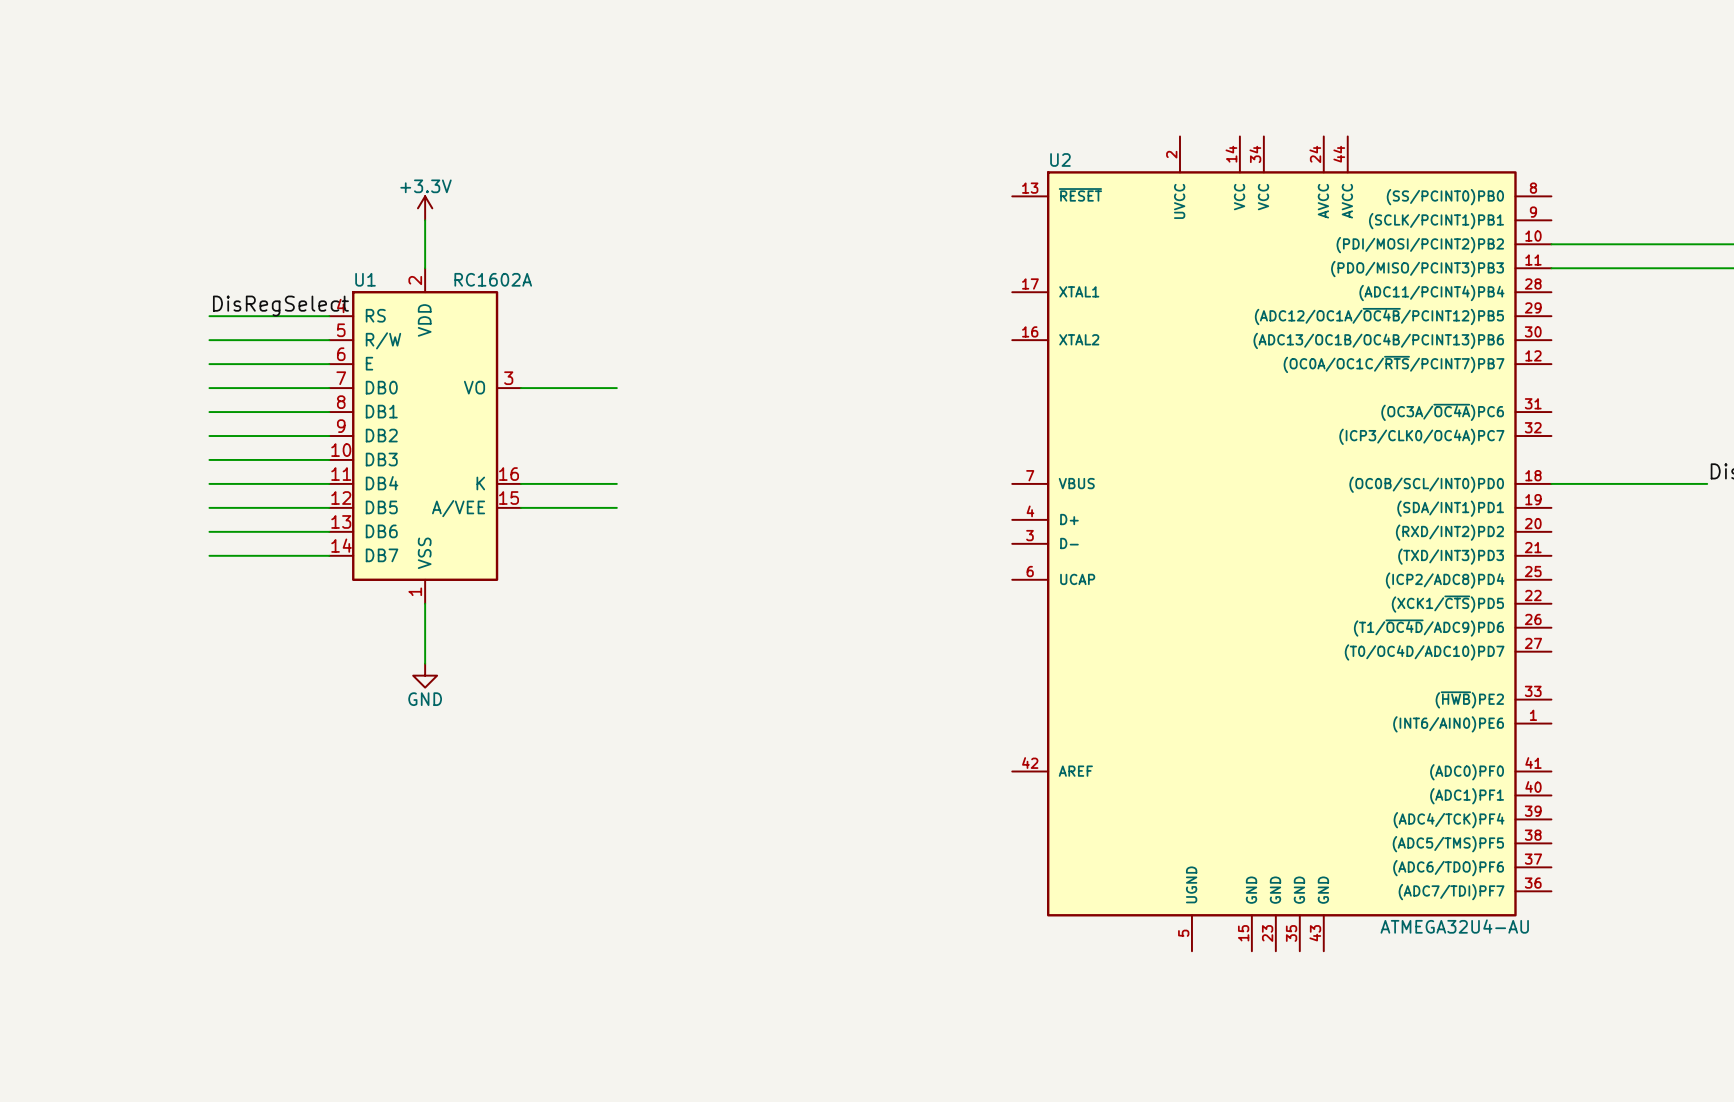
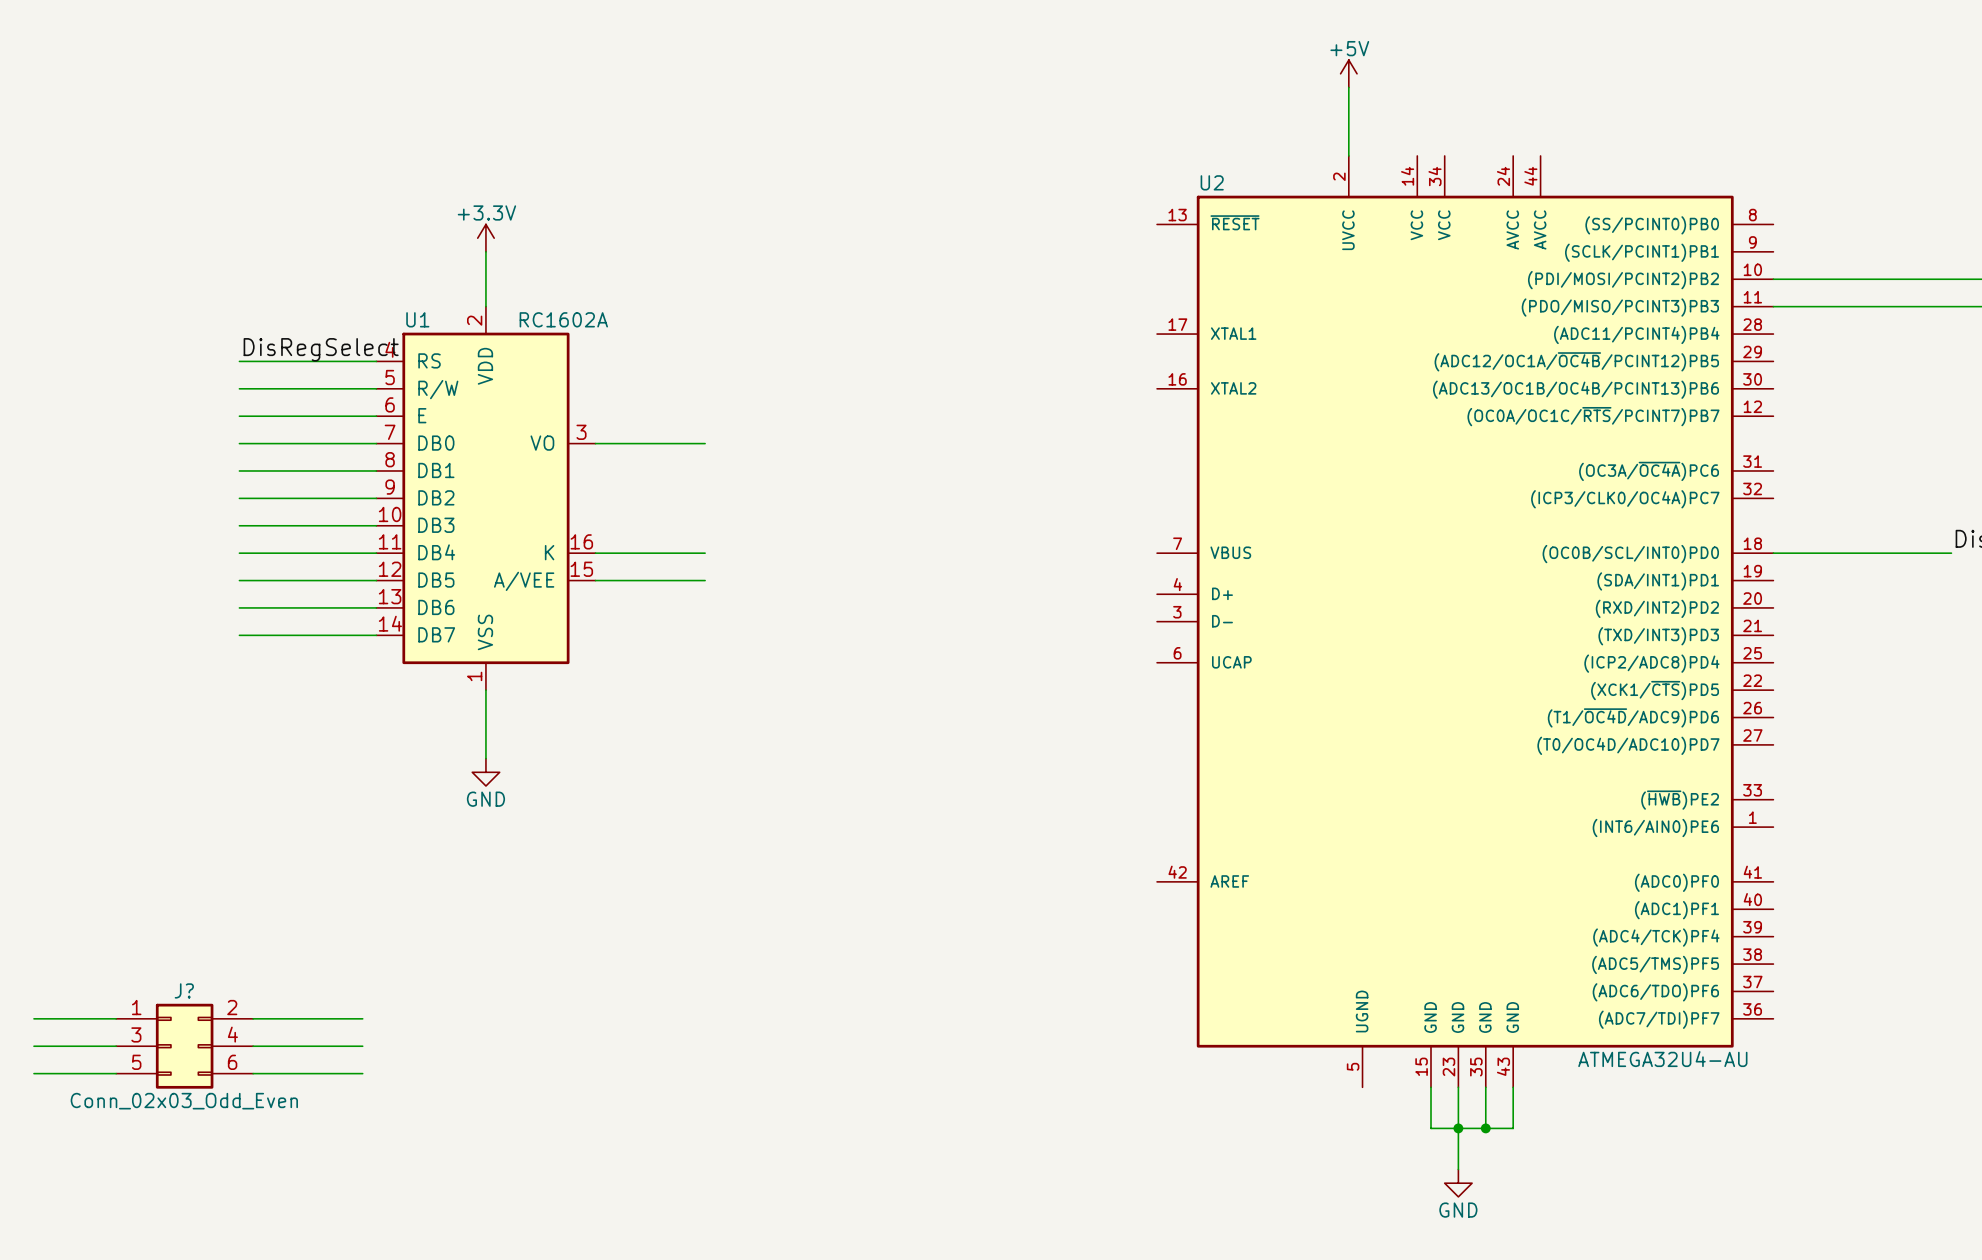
power symbol: none -> +5V (1348, 73)
wire: none -> (1348, 87) (1348, 155)
wire: none -> (33, 1018) (116, 1018)
wire: none -> (253, 1018) (362, 1018)
wire: none -> (33, 1046) (116, 1046)
J?: none -> Conn_02x03_Odd_Even (184, 1046)
wire: none -> (253, 1046) (362, 1046)
wire: none -> (33, 1073) (116, 1073)
wire: none -> (253, 1073) (362, 1073)
wire: none -> (1431, 1087) (1431, 1128) (1513, 1128) (1513, 1087)
wire: none -> (1458, 1087) (1458, 1169)
wire: none -> (1485, 1087) (1485, 1128)
junction: none -> (1458, 1128)
junction: none -> (1485, 1128)
power symbol: none -> GND (1458, 1183)

